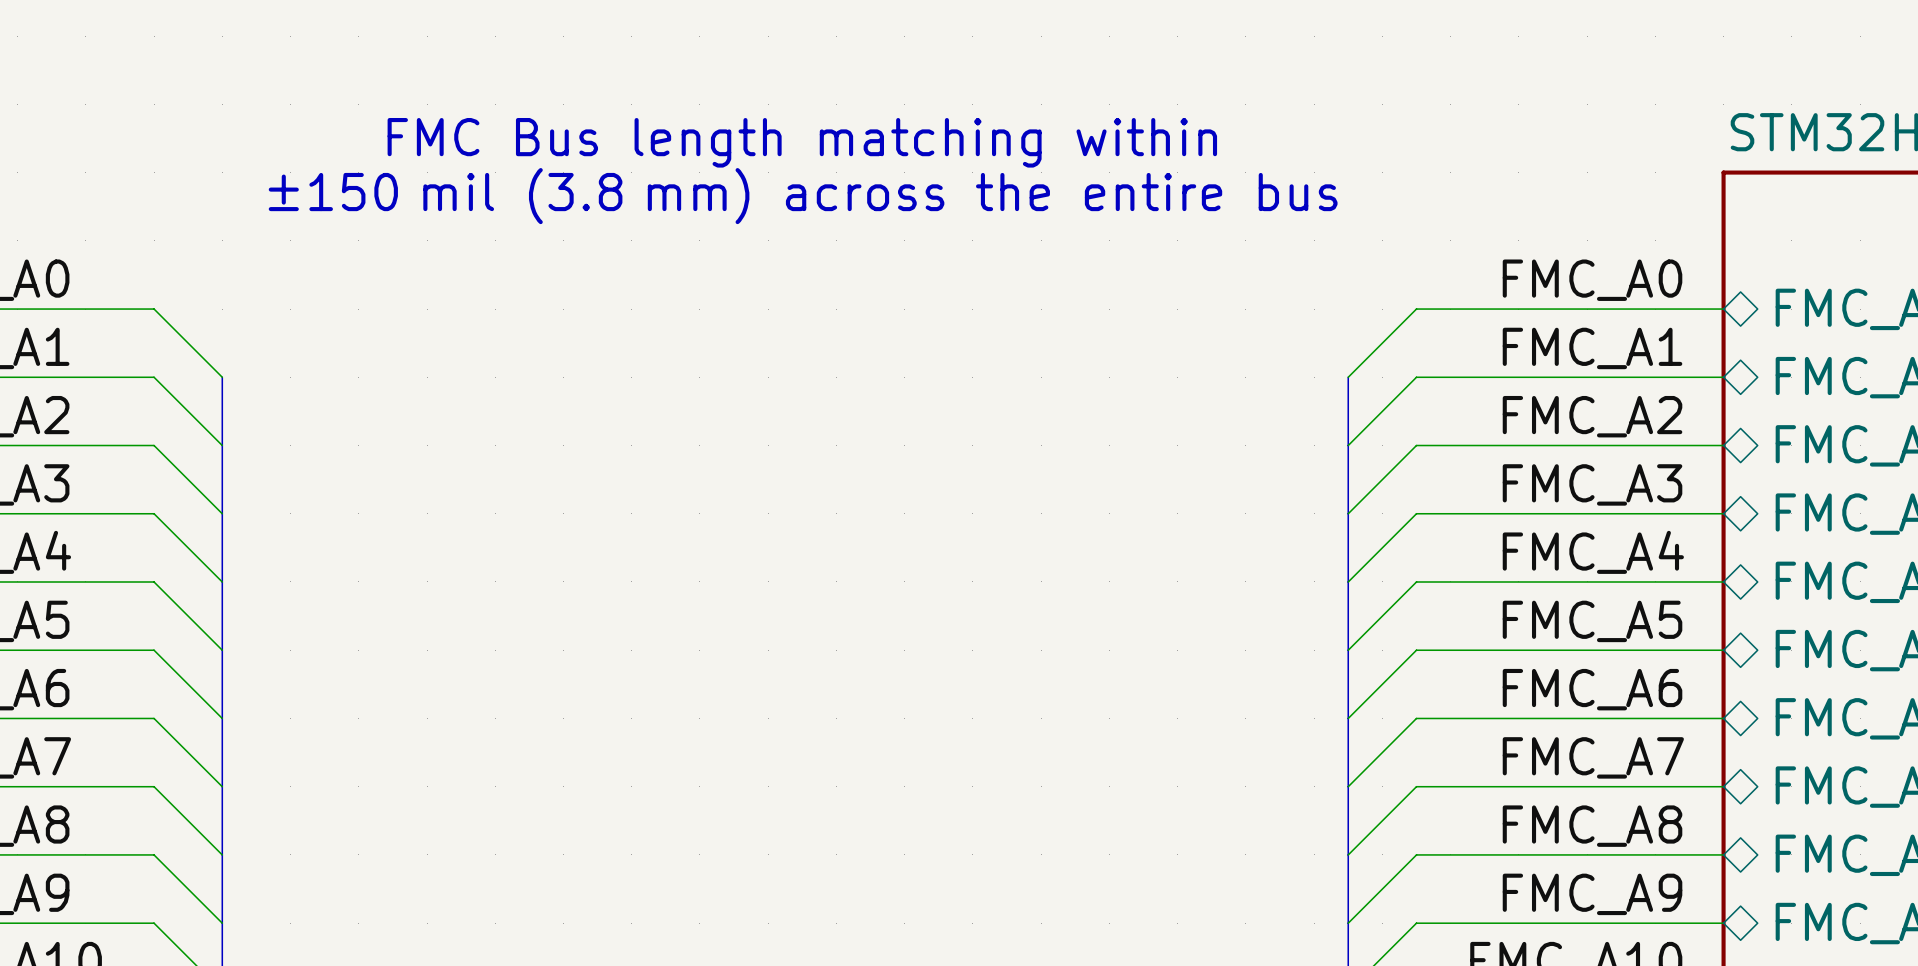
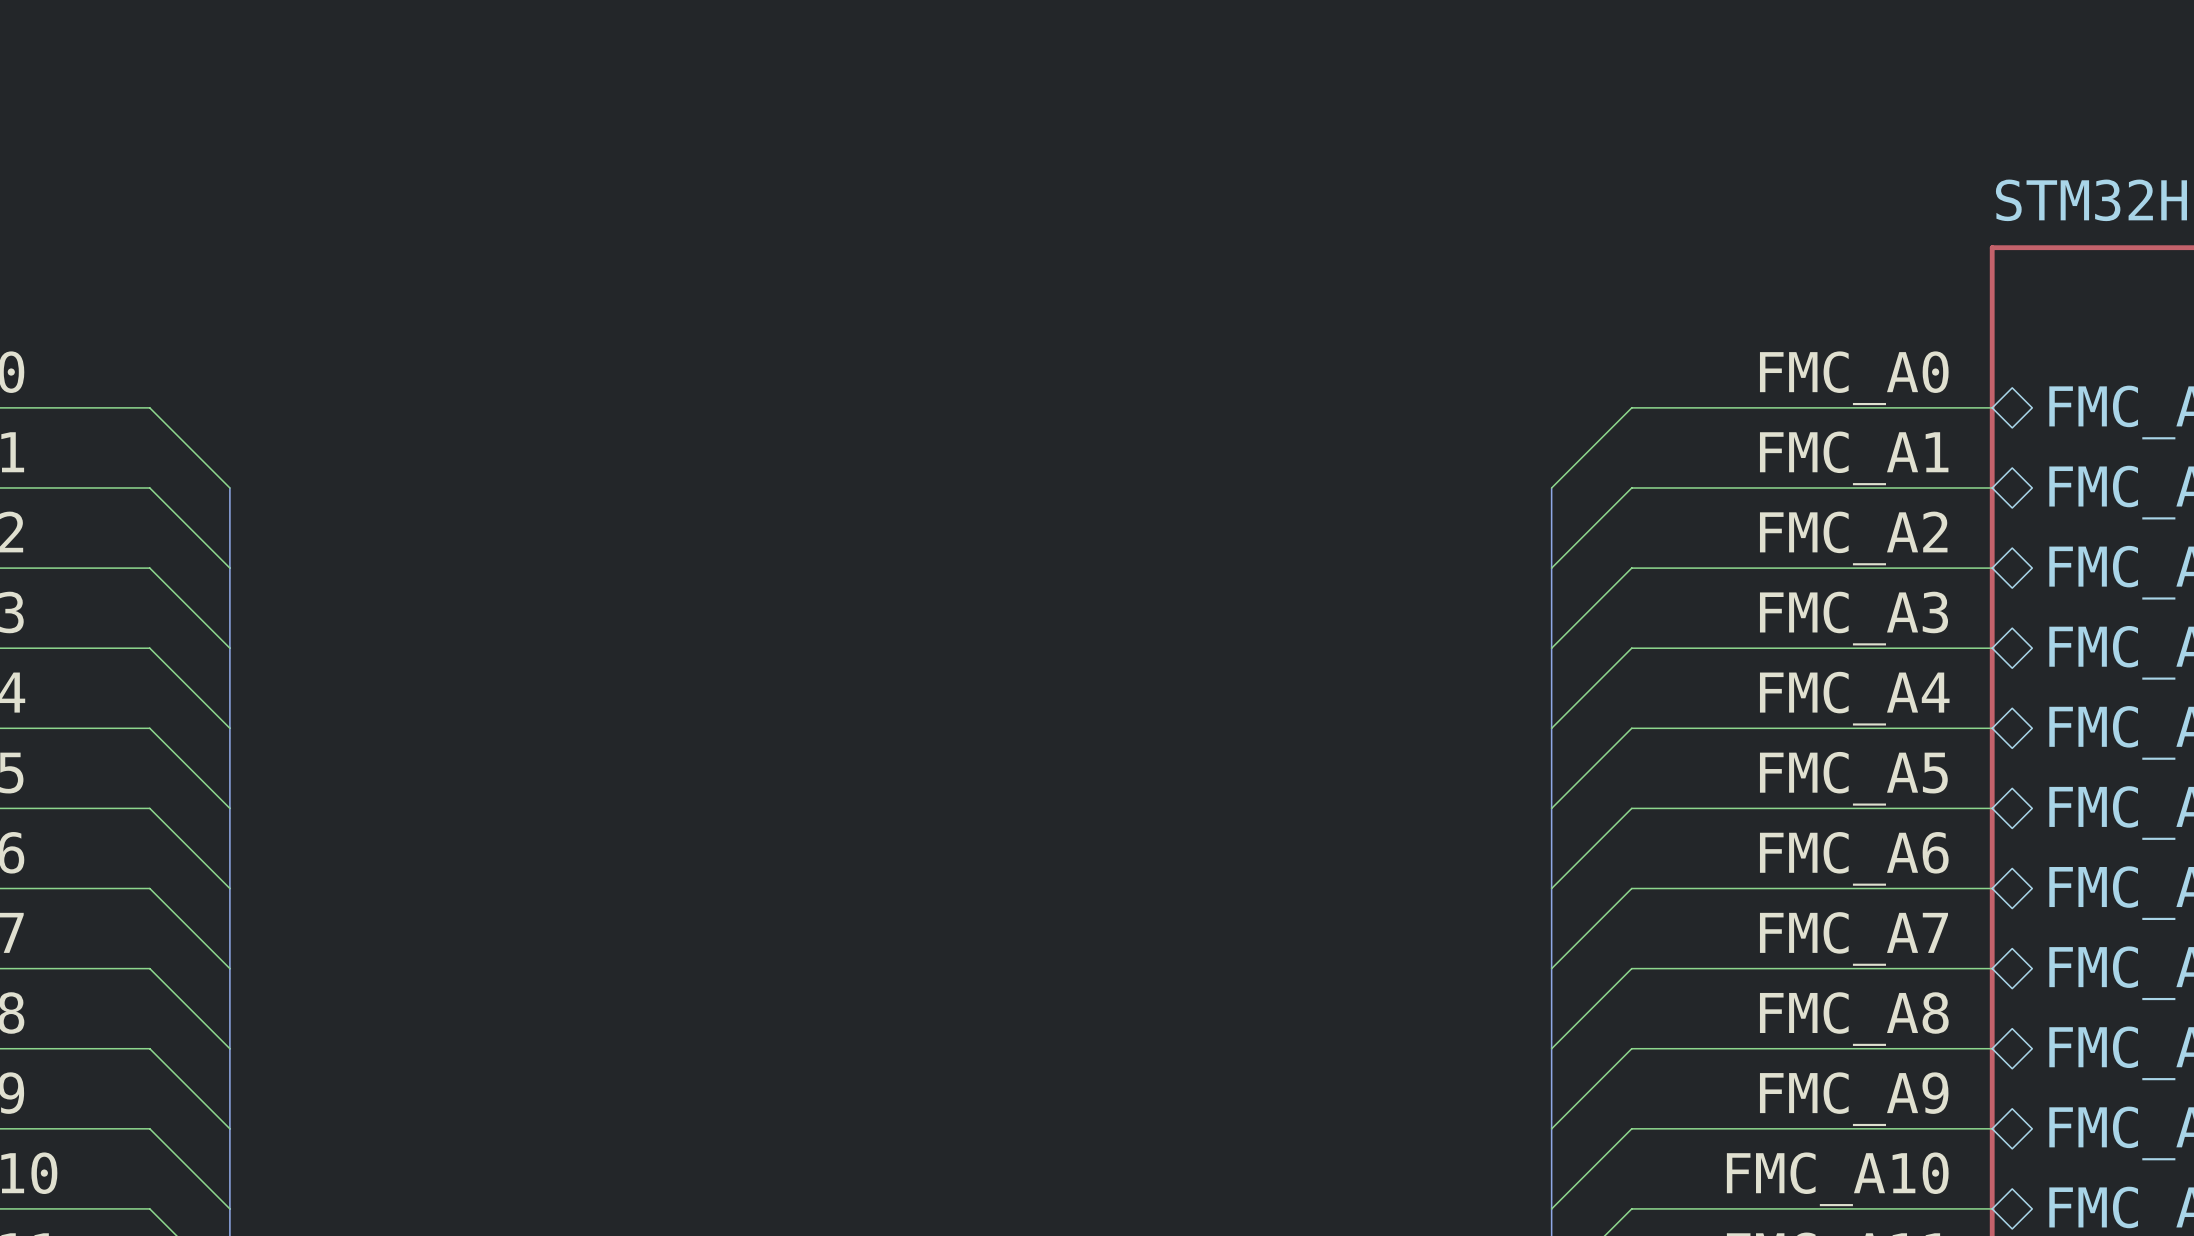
text: FMC Bus length matching within (802, 142) -> none
text: ±150 mil (3.8 mm) across the entire bus (803, 196) -> none

